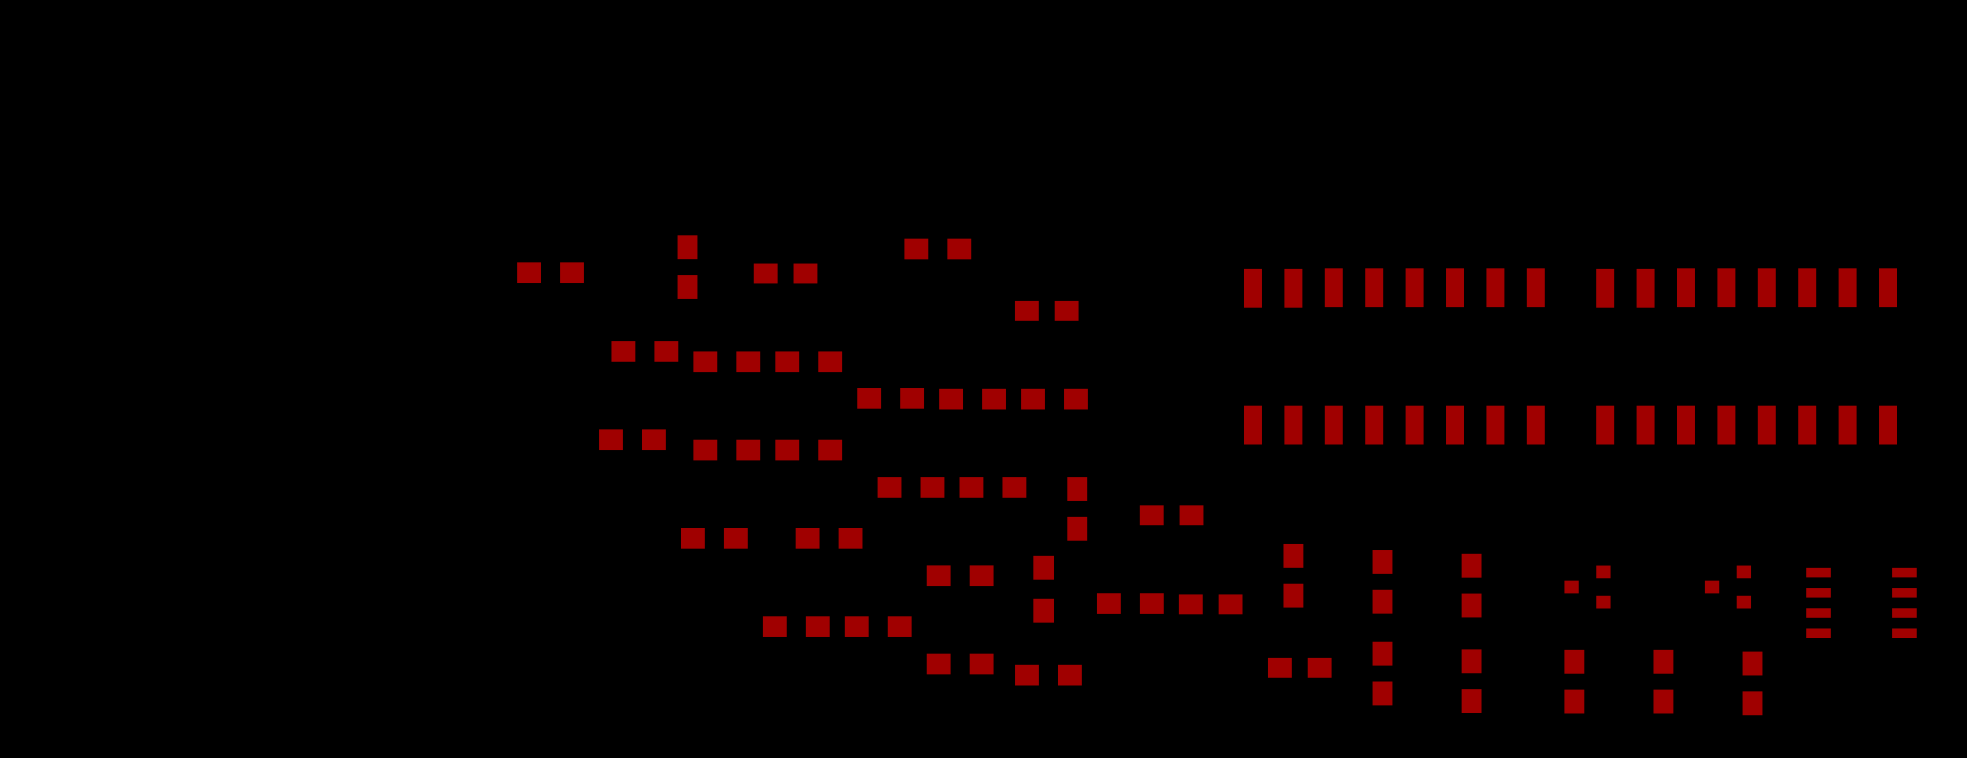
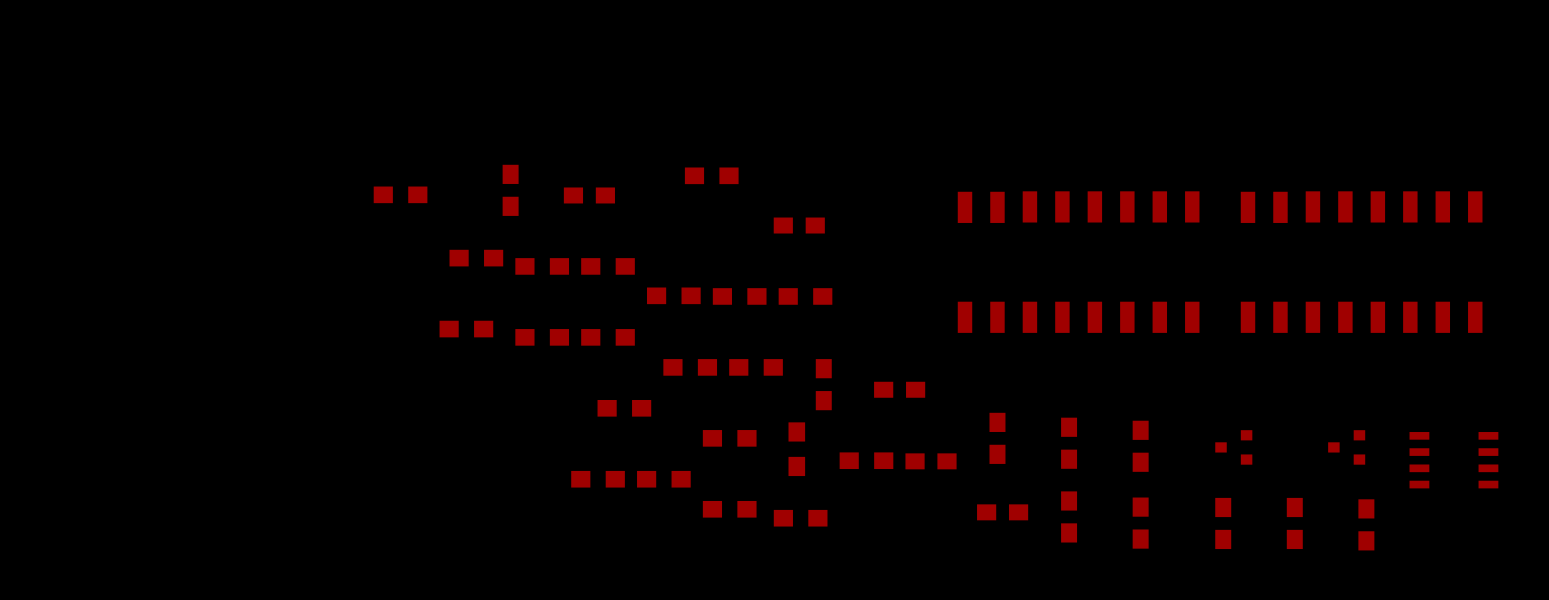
part: (714, 538) -> none

